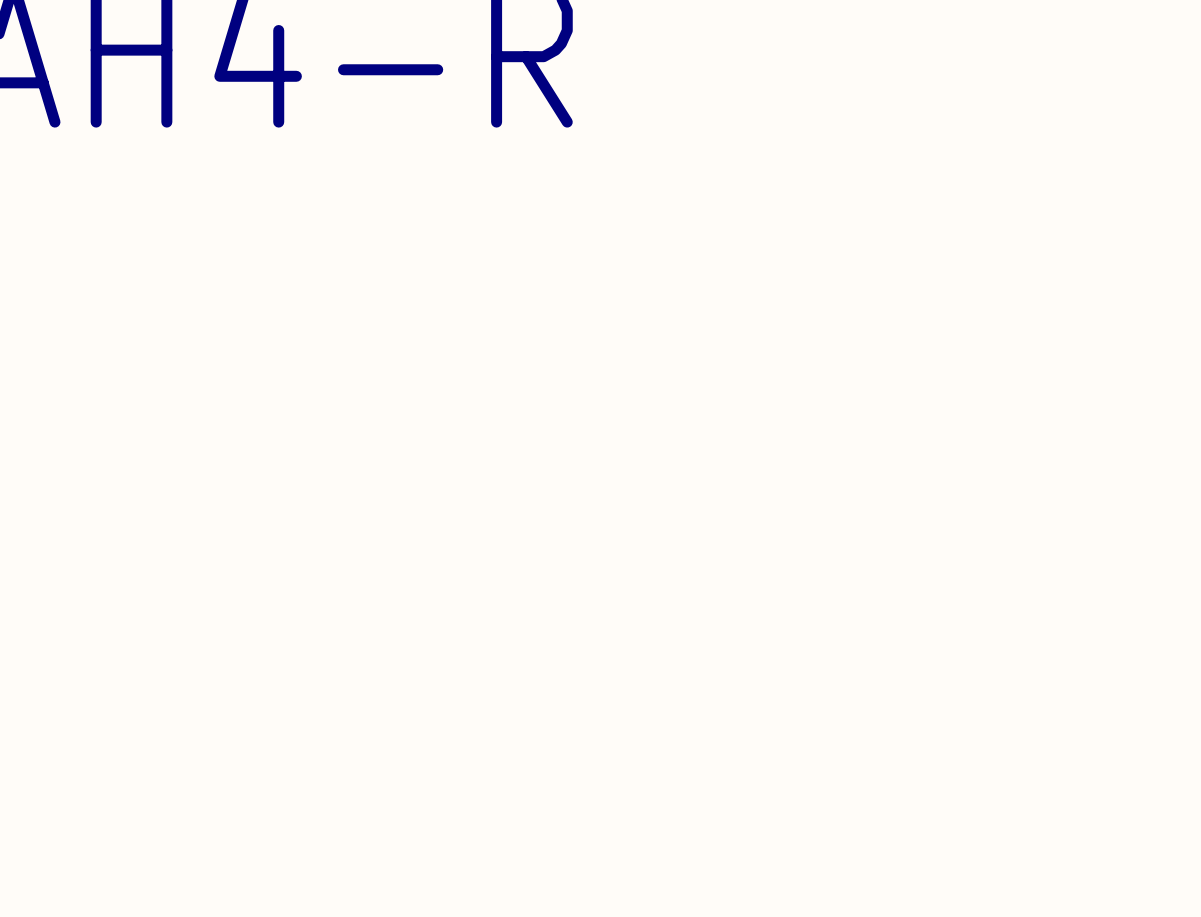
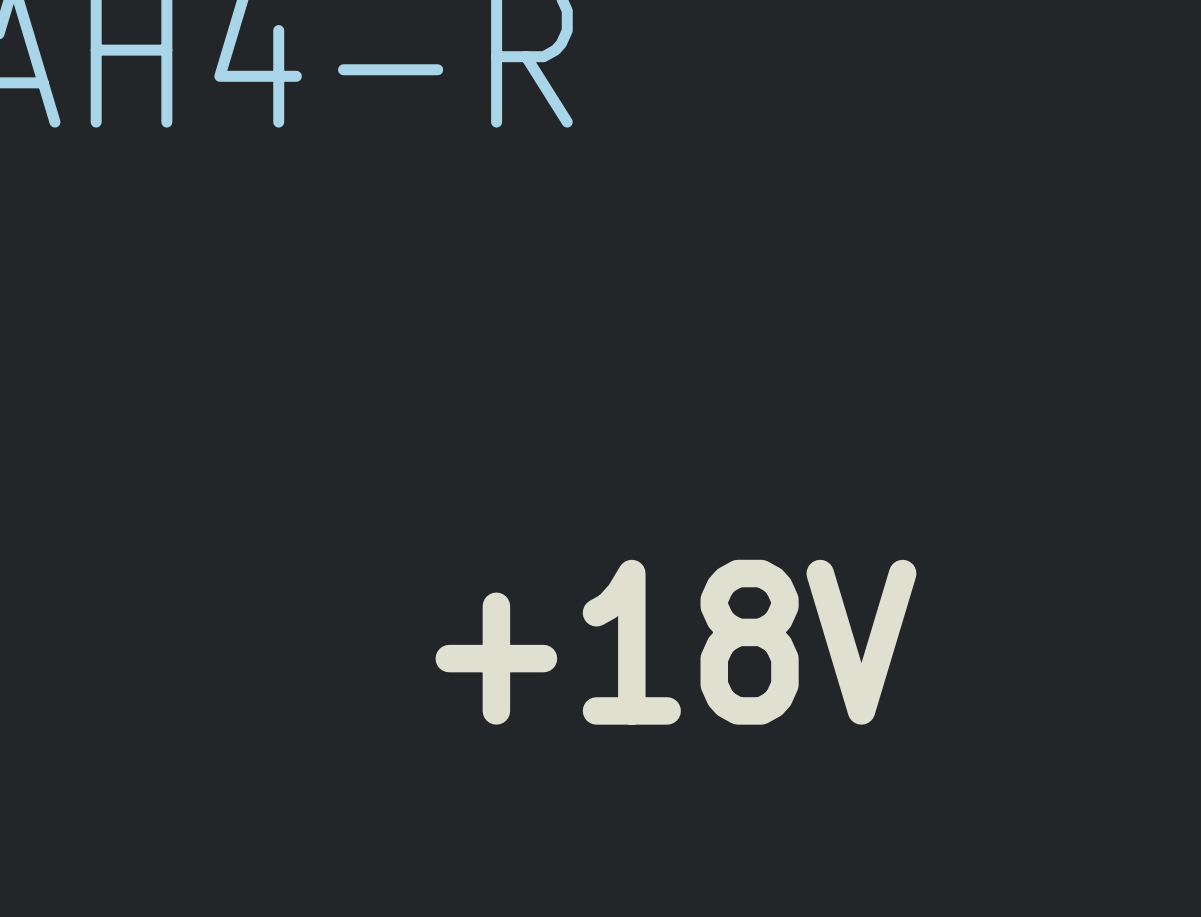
label: none -> +18V (675, 642)

